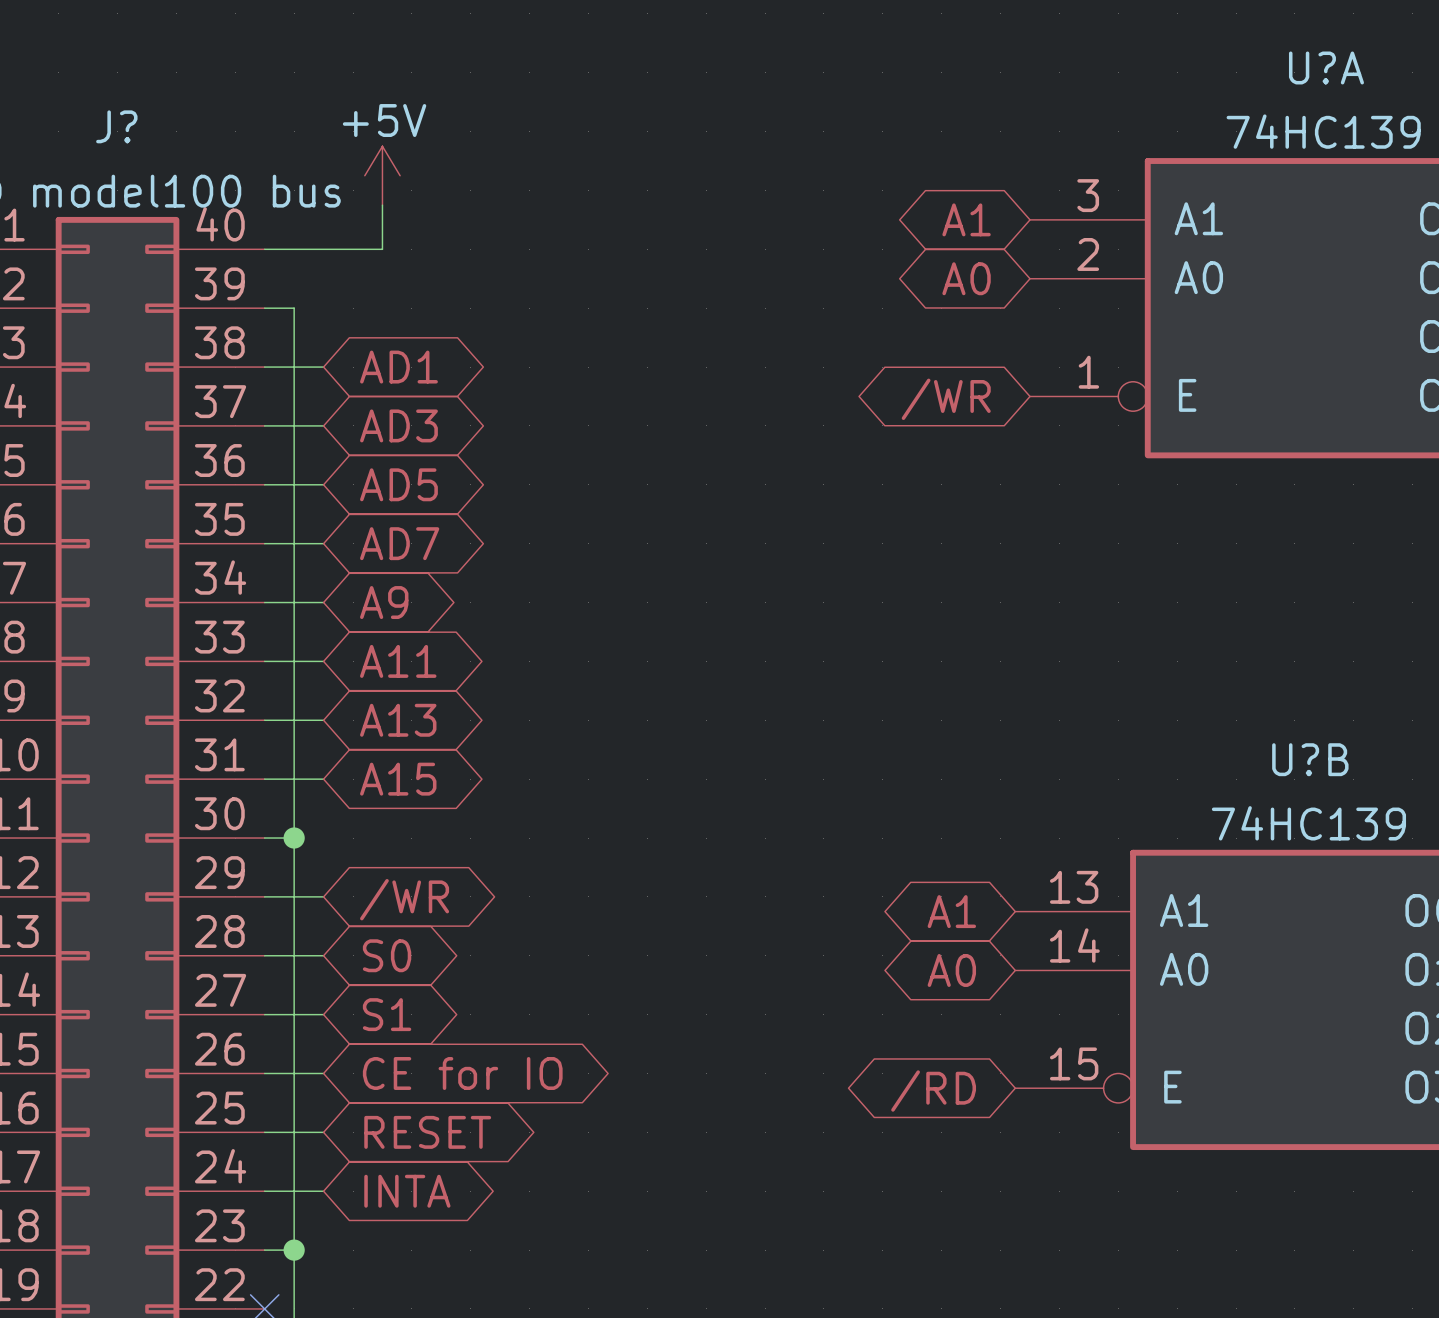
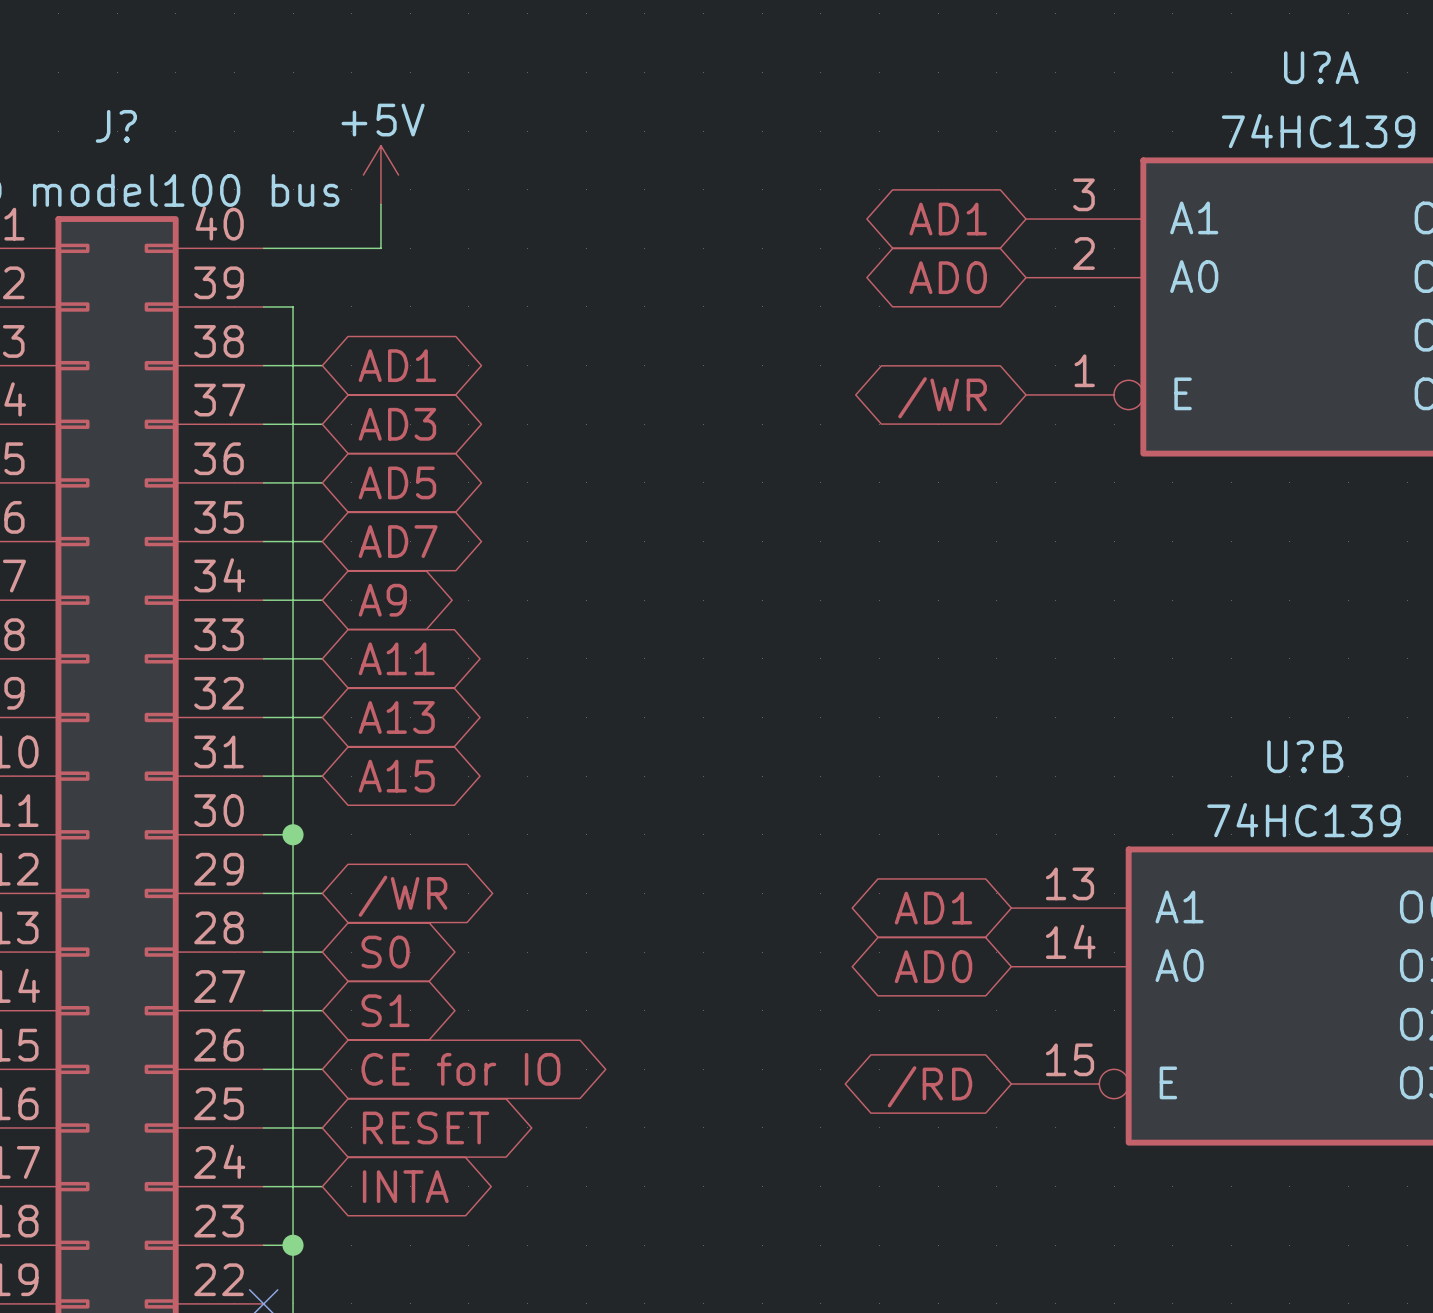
global label: A1 (966, 219) -> AD1 (948, 219)
global label: A0 (966, 278) -> AD0 (948, 277)
global label: A1 (951, 911) -> AD1 (933, 908)
global label: A0 (951, 970) -> AD0 (933, 966)

